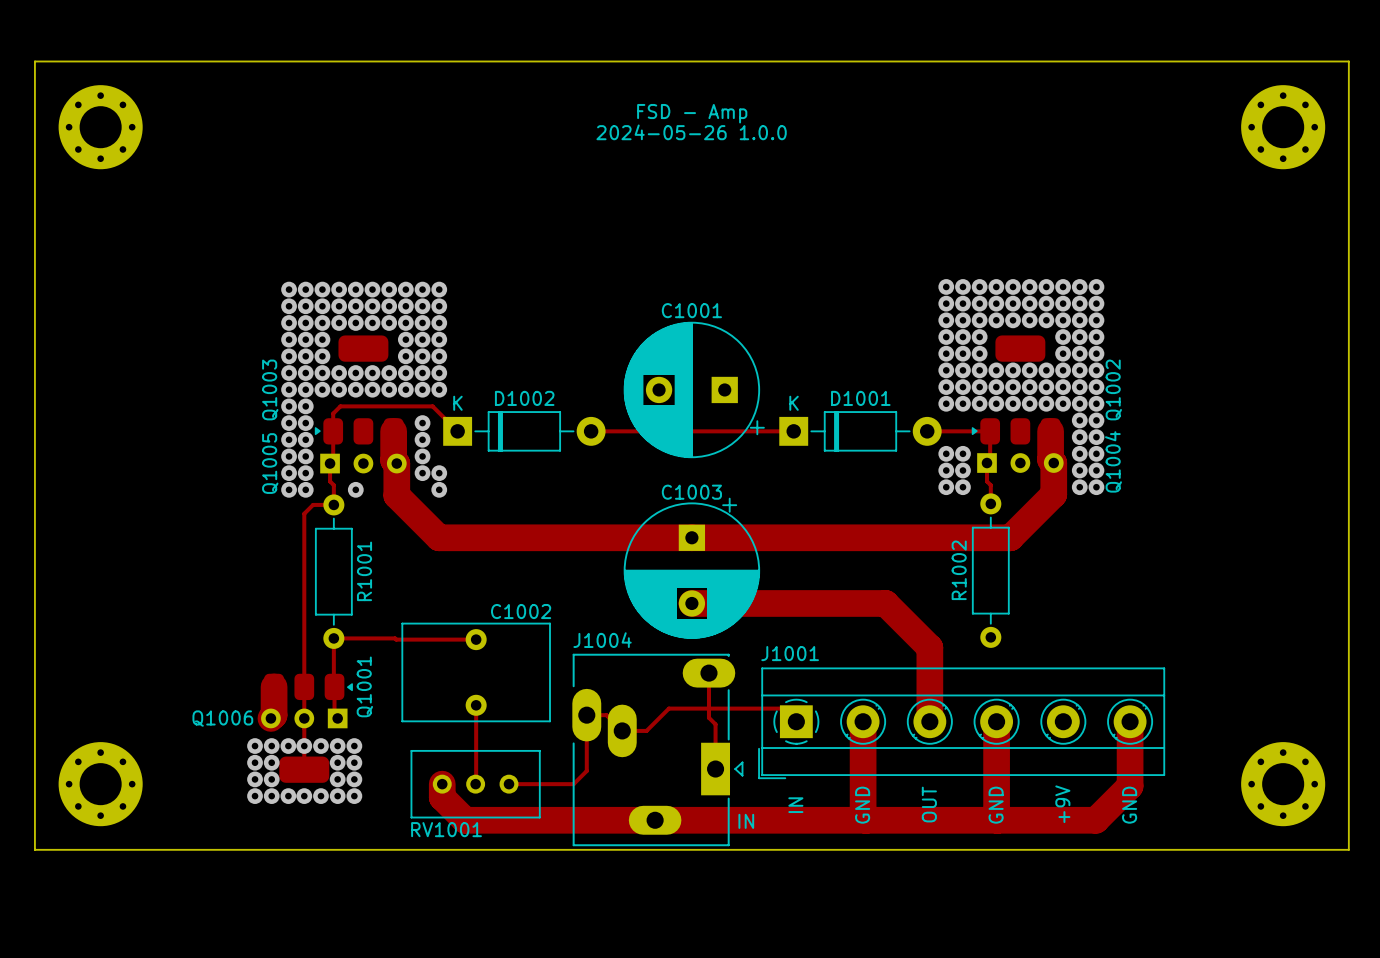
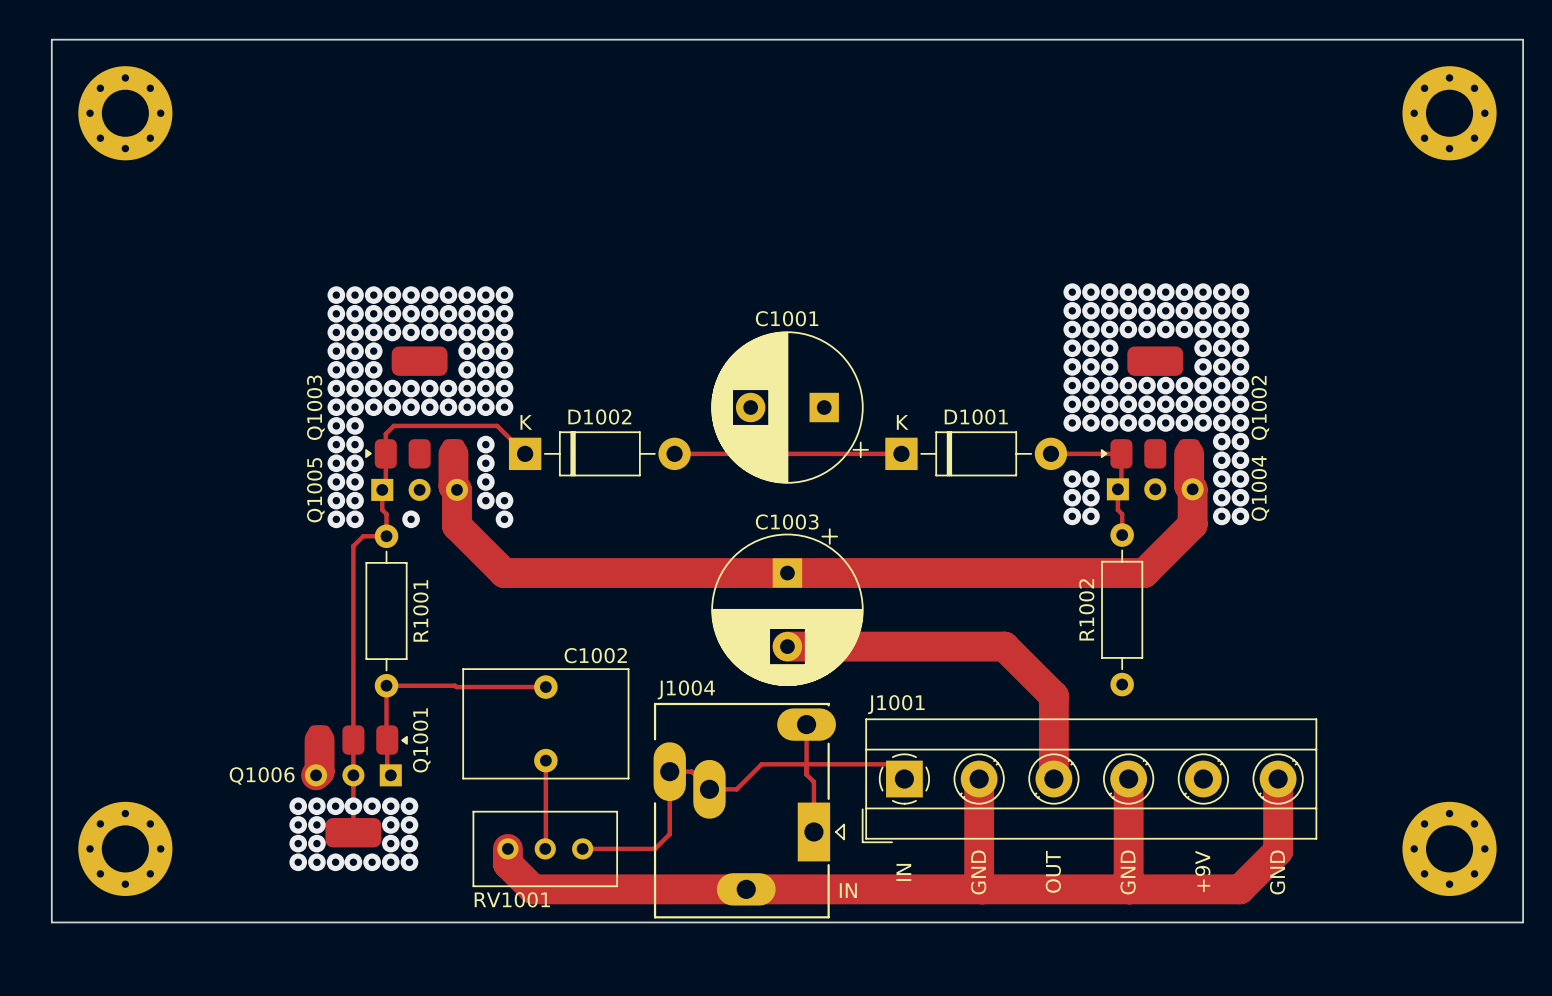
text: FSD - Amp (692, 113) -> none
text: 2024-05-26 1.0.0 (691, 132) -> none

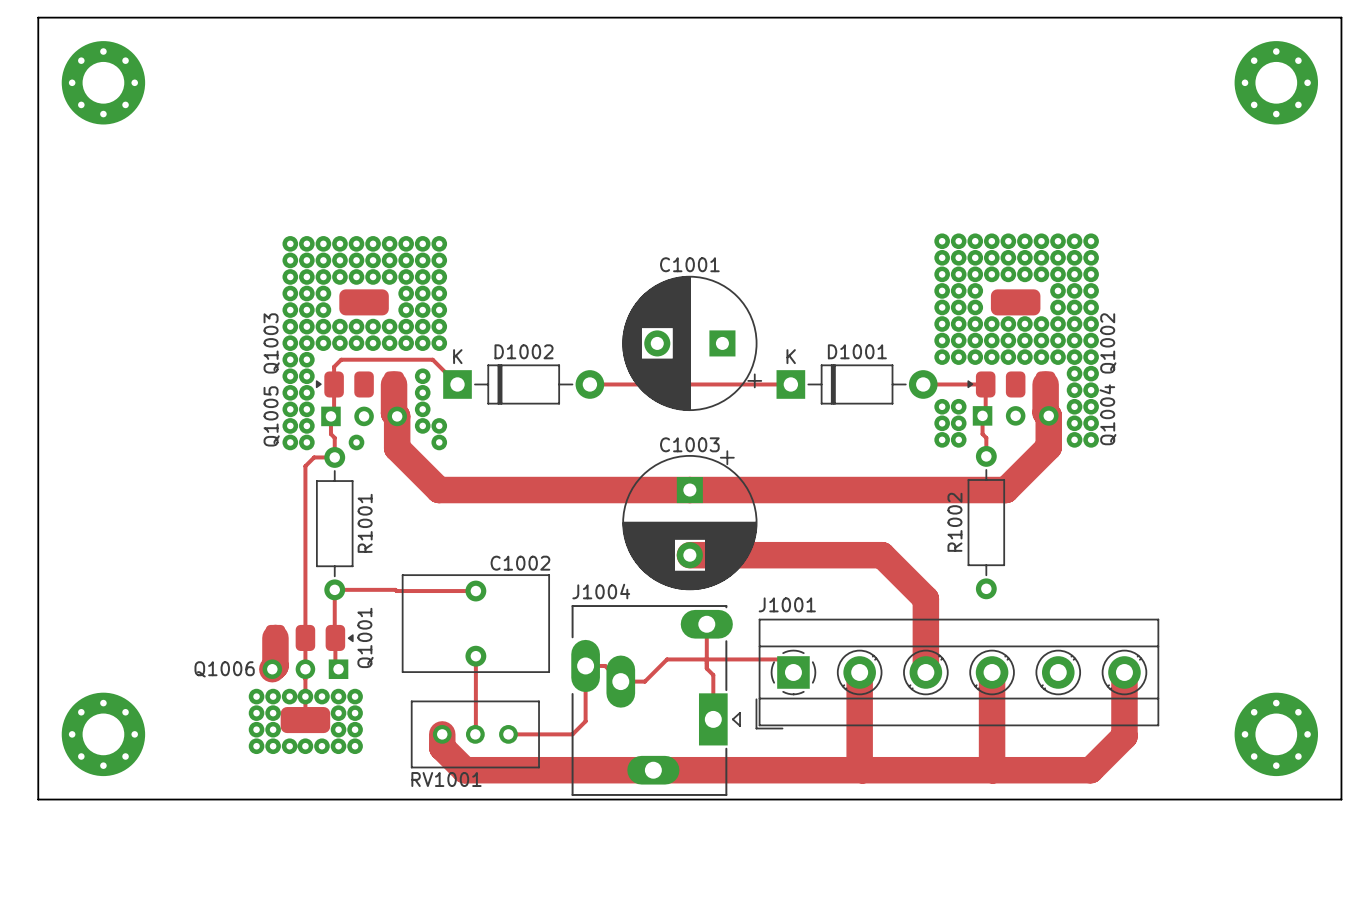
text: OUT (1053, 871) -> none
text: +9V (1202, 871) -> none
text: IN (903, 872) -> none
text: GND (978, 872) -> none
text: GND (1128, 872) -> none
text: GND (1277, 872) -> none
text: IN (848, 890) -> none

